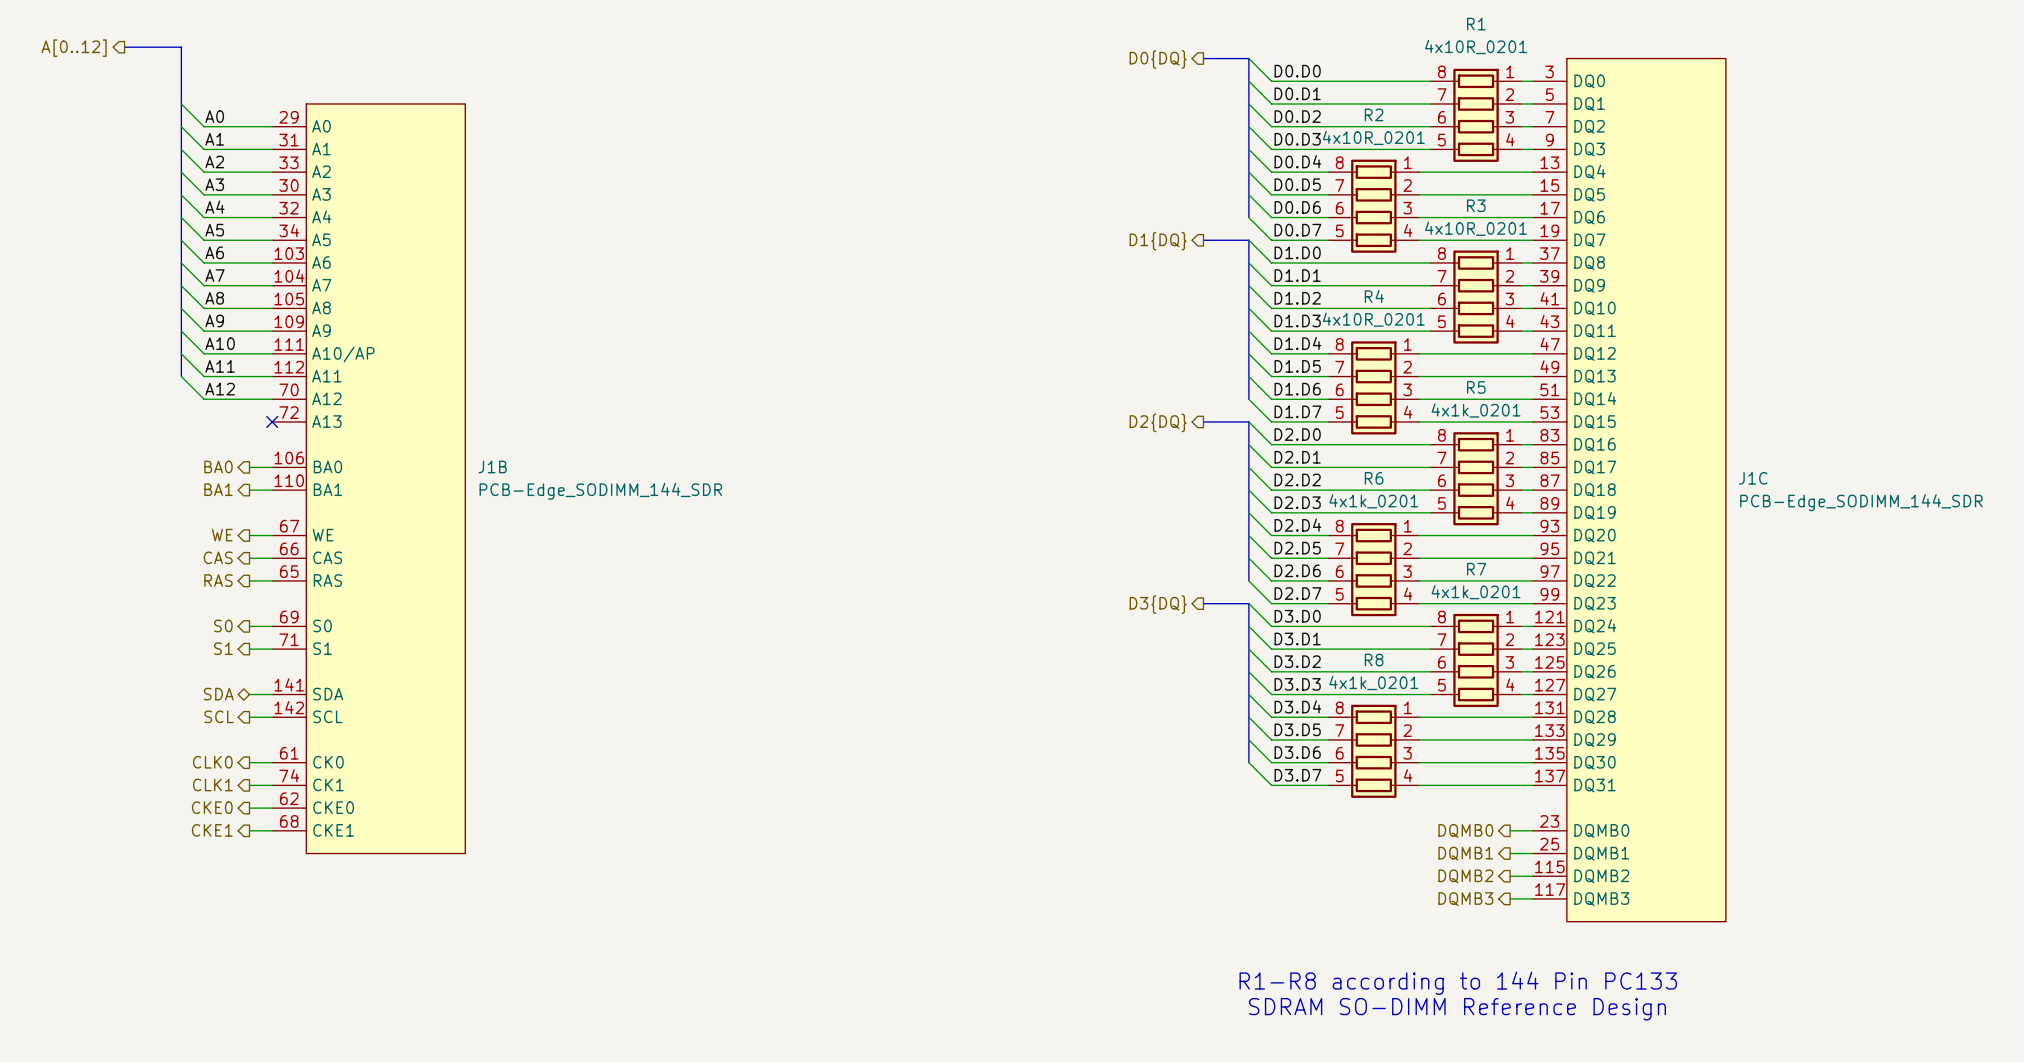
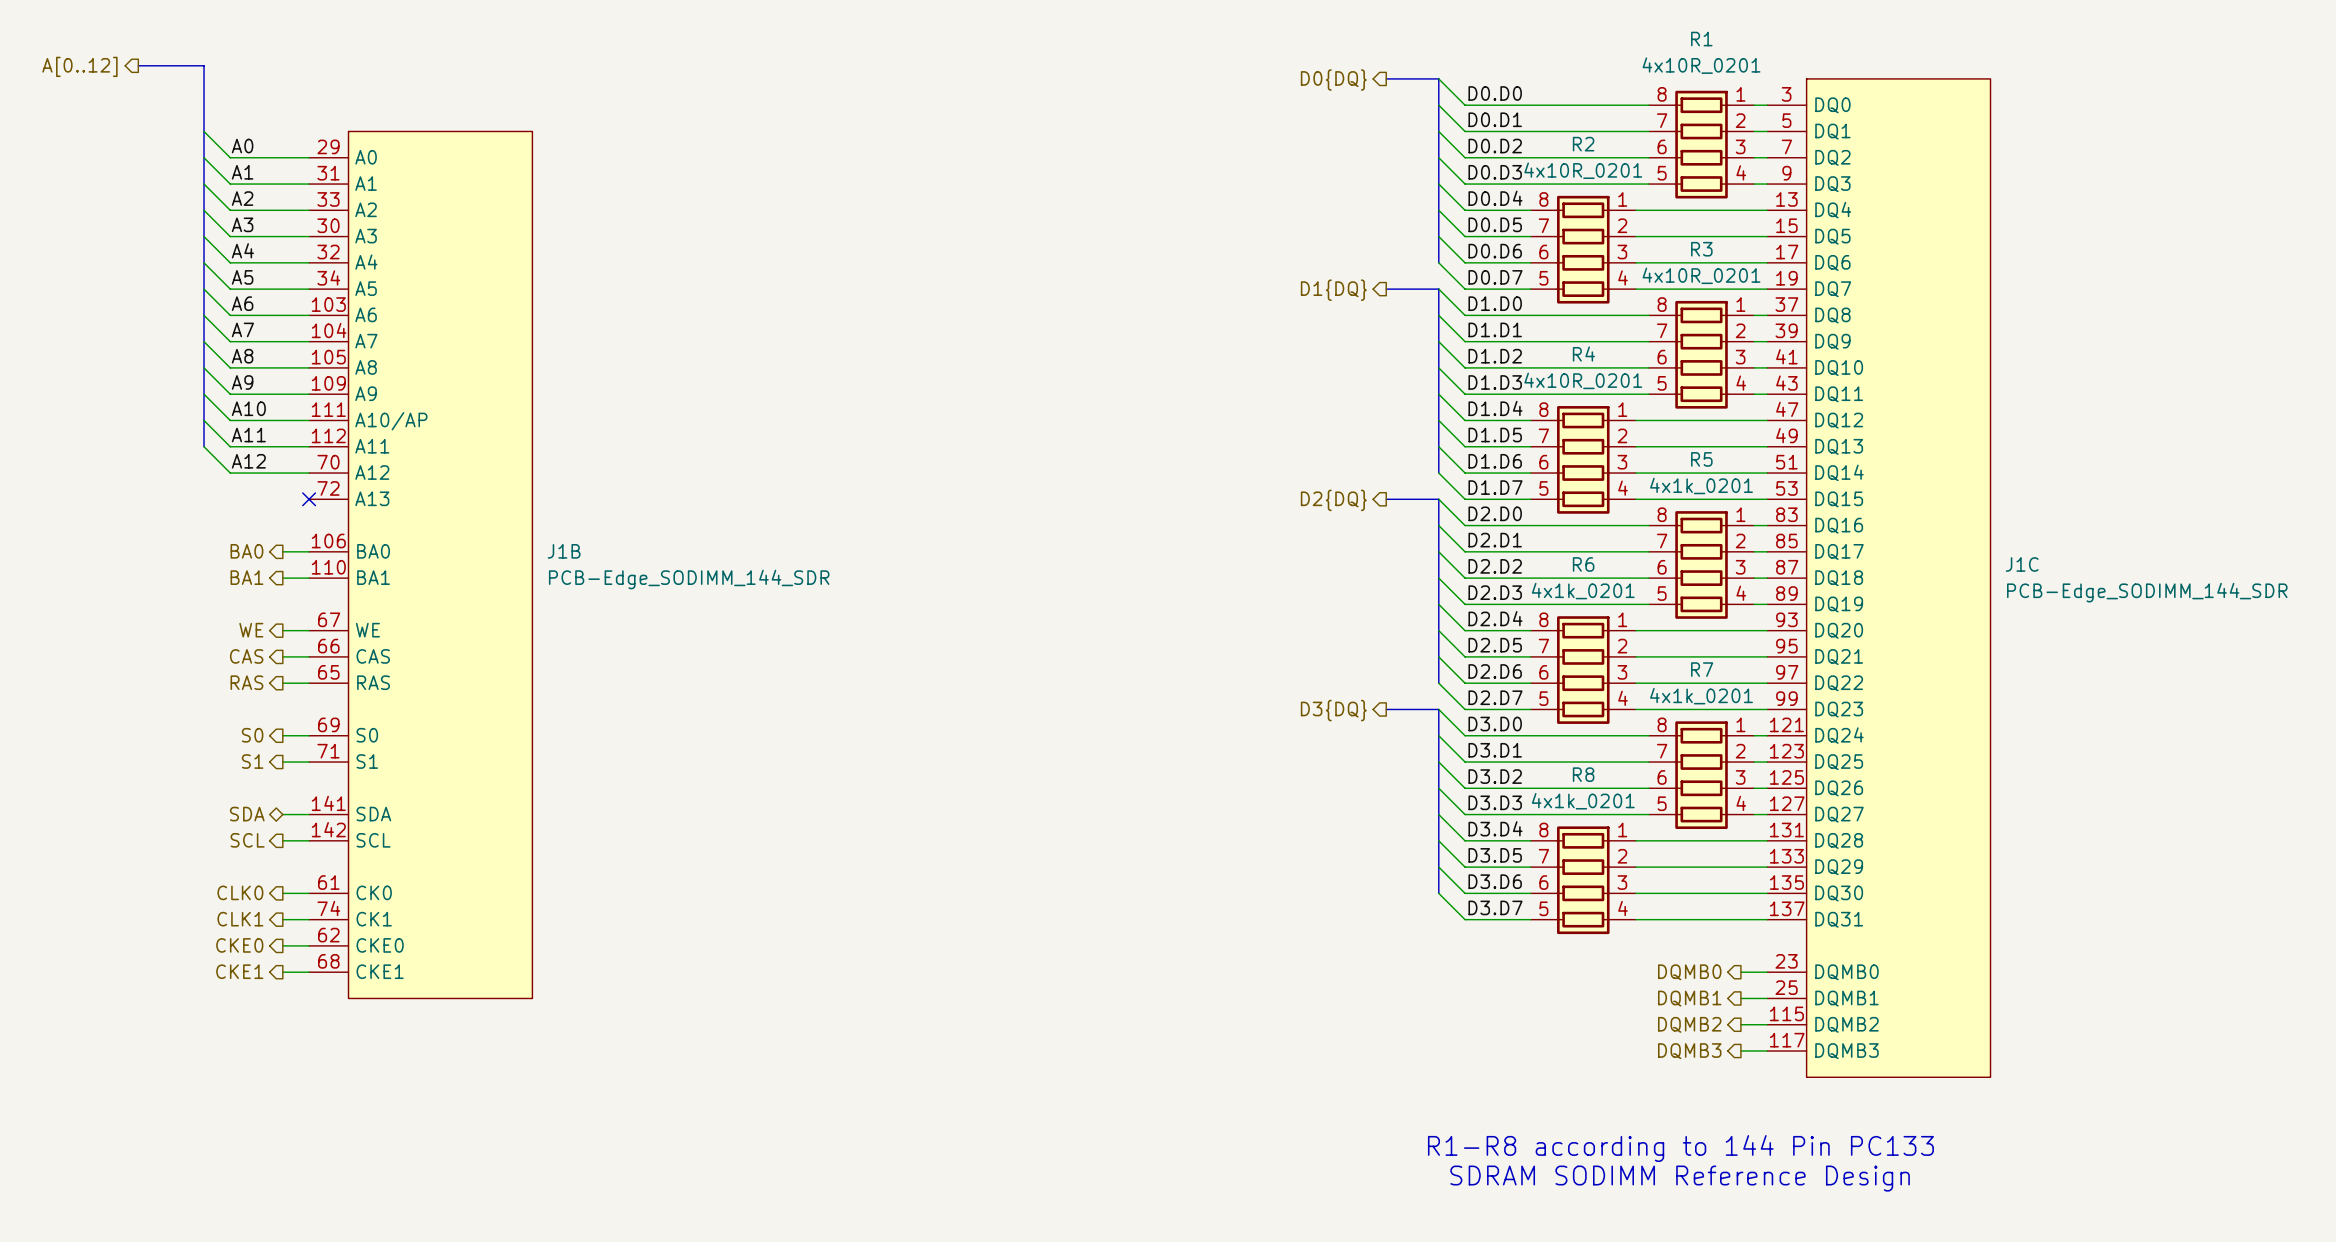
text: SDRAM SO-DIMM Reference Design (1457, 1009) -> SDRAM SODIMM Reference Design (1680, 1178)

